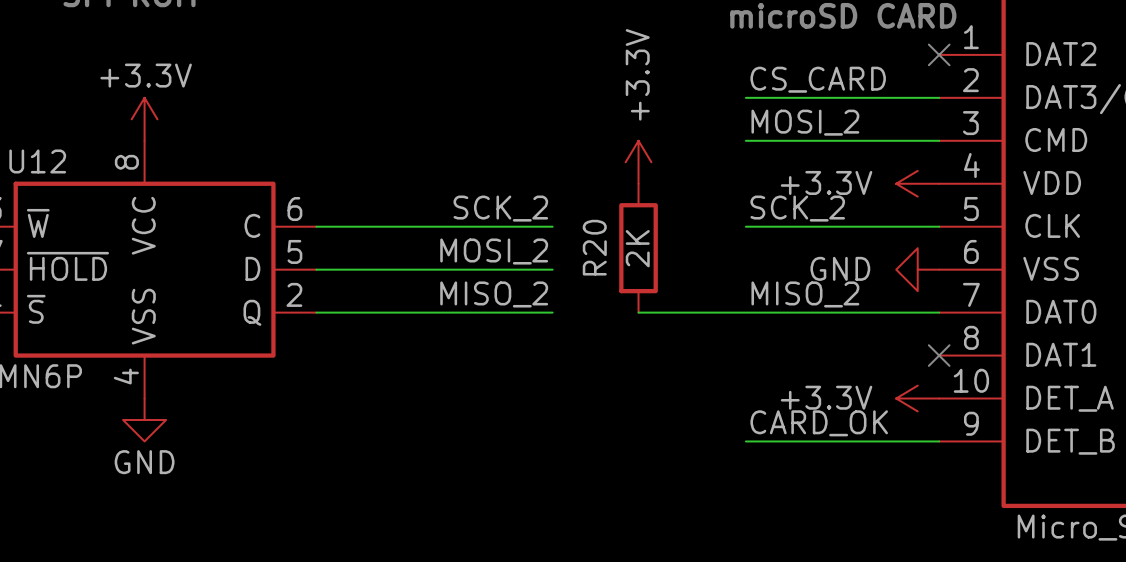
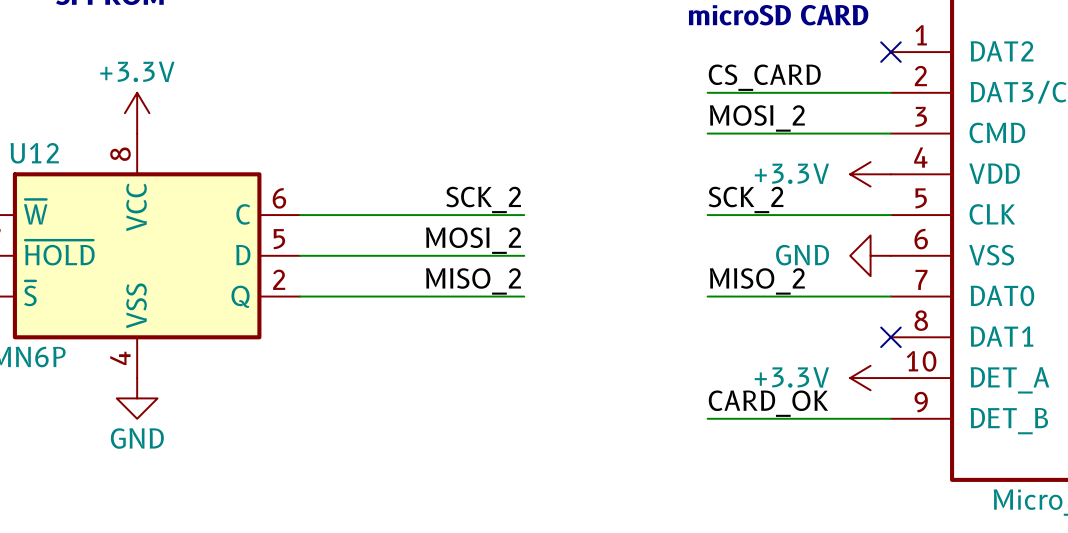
power symbol: +3.3V (638, 162) -> none
R20: 2K (638, 248) -> none
wire: (638, 312) (745, 312) -> none

